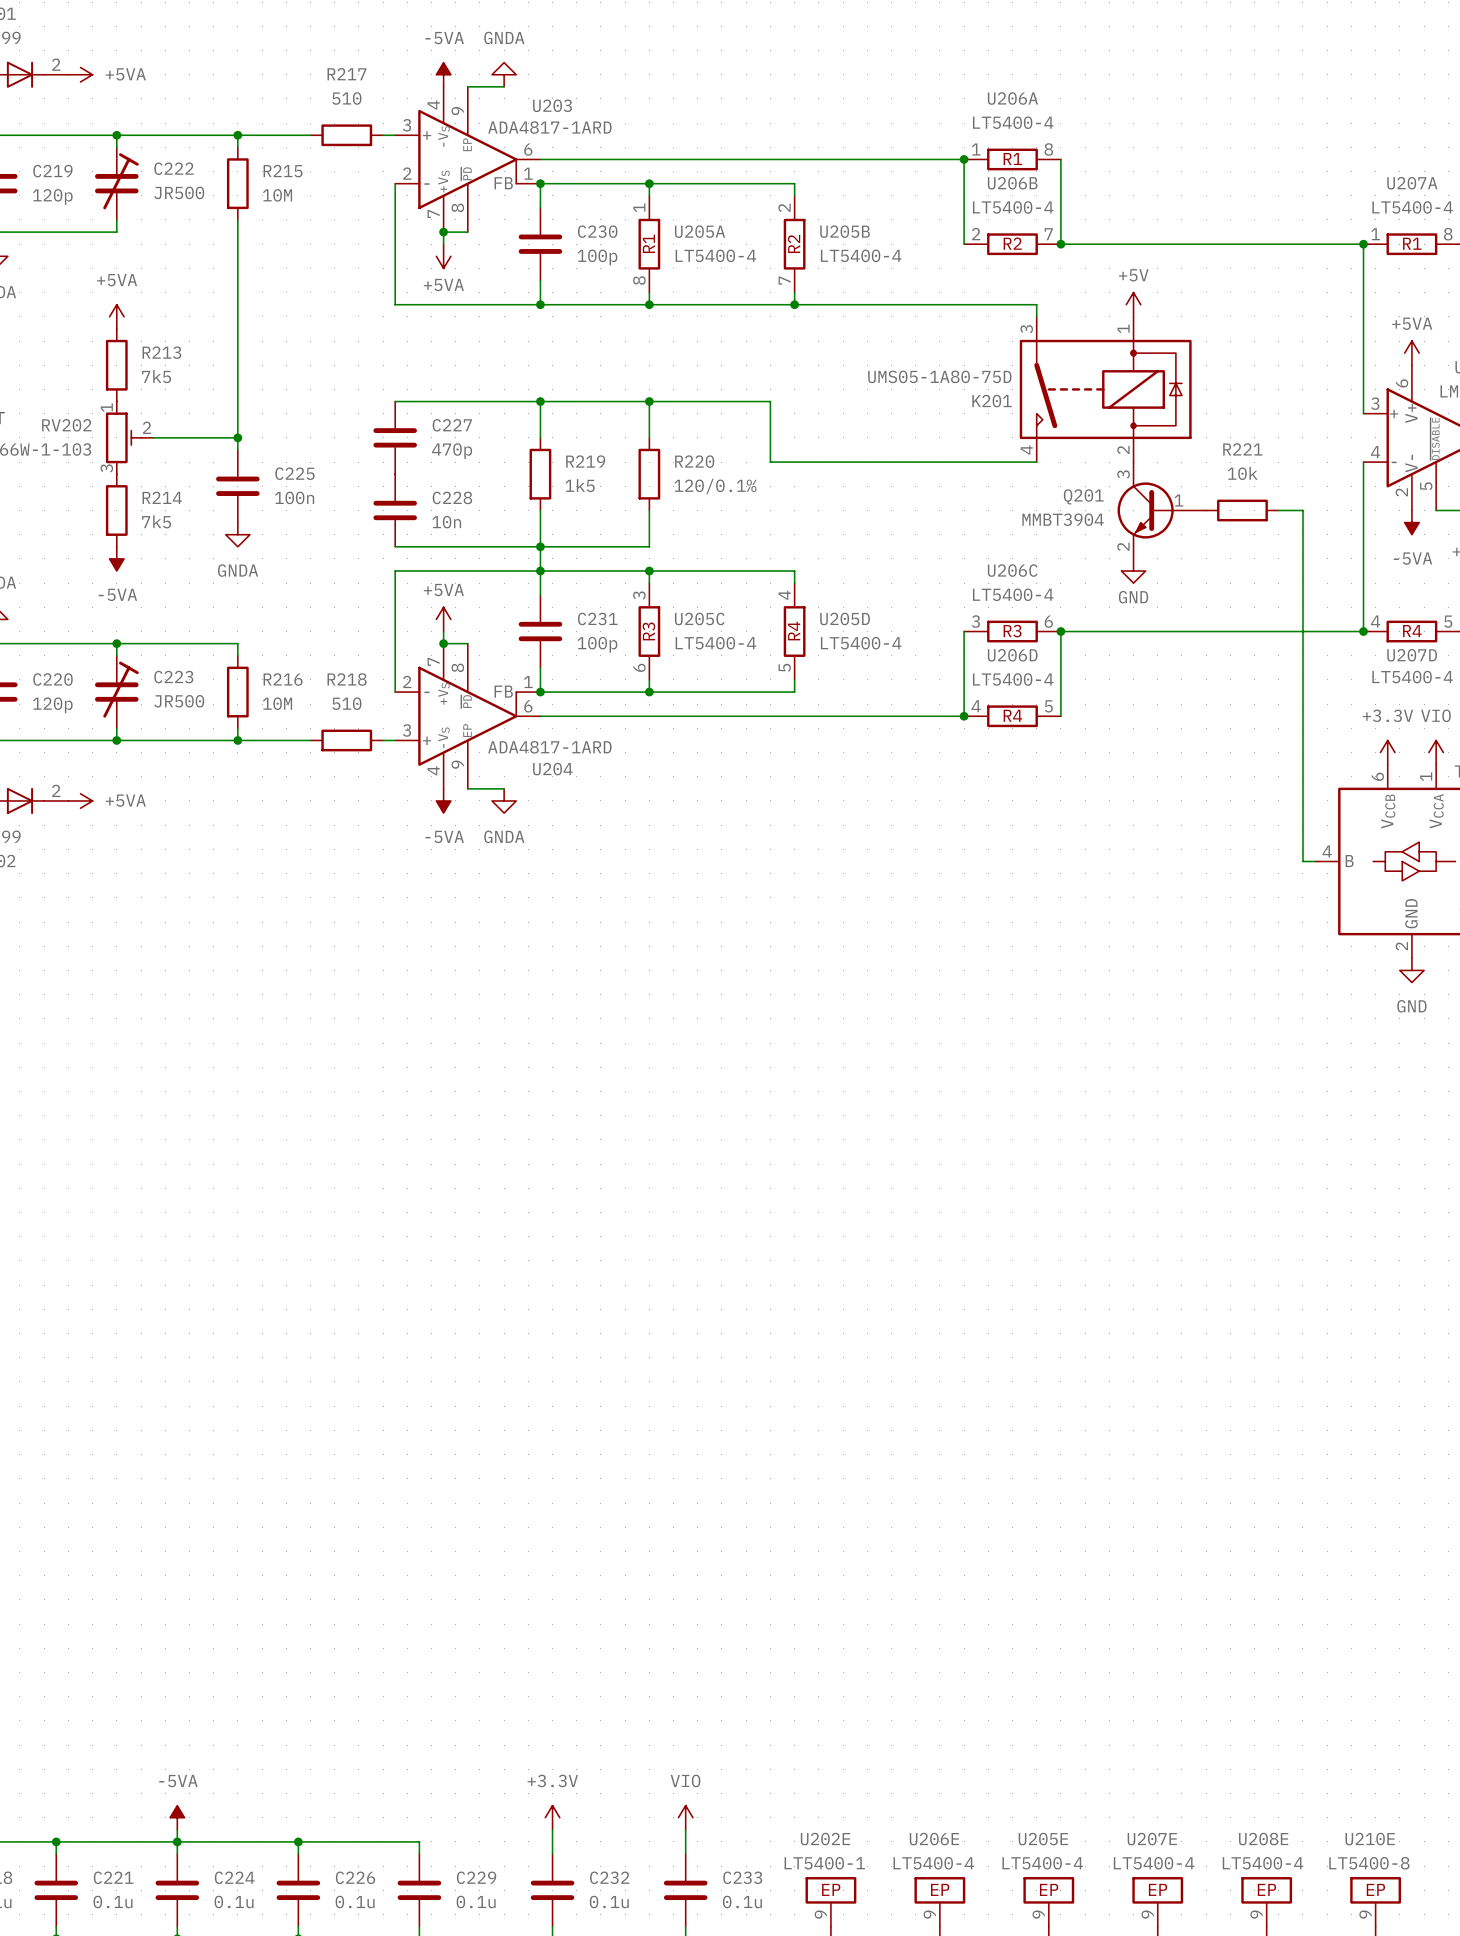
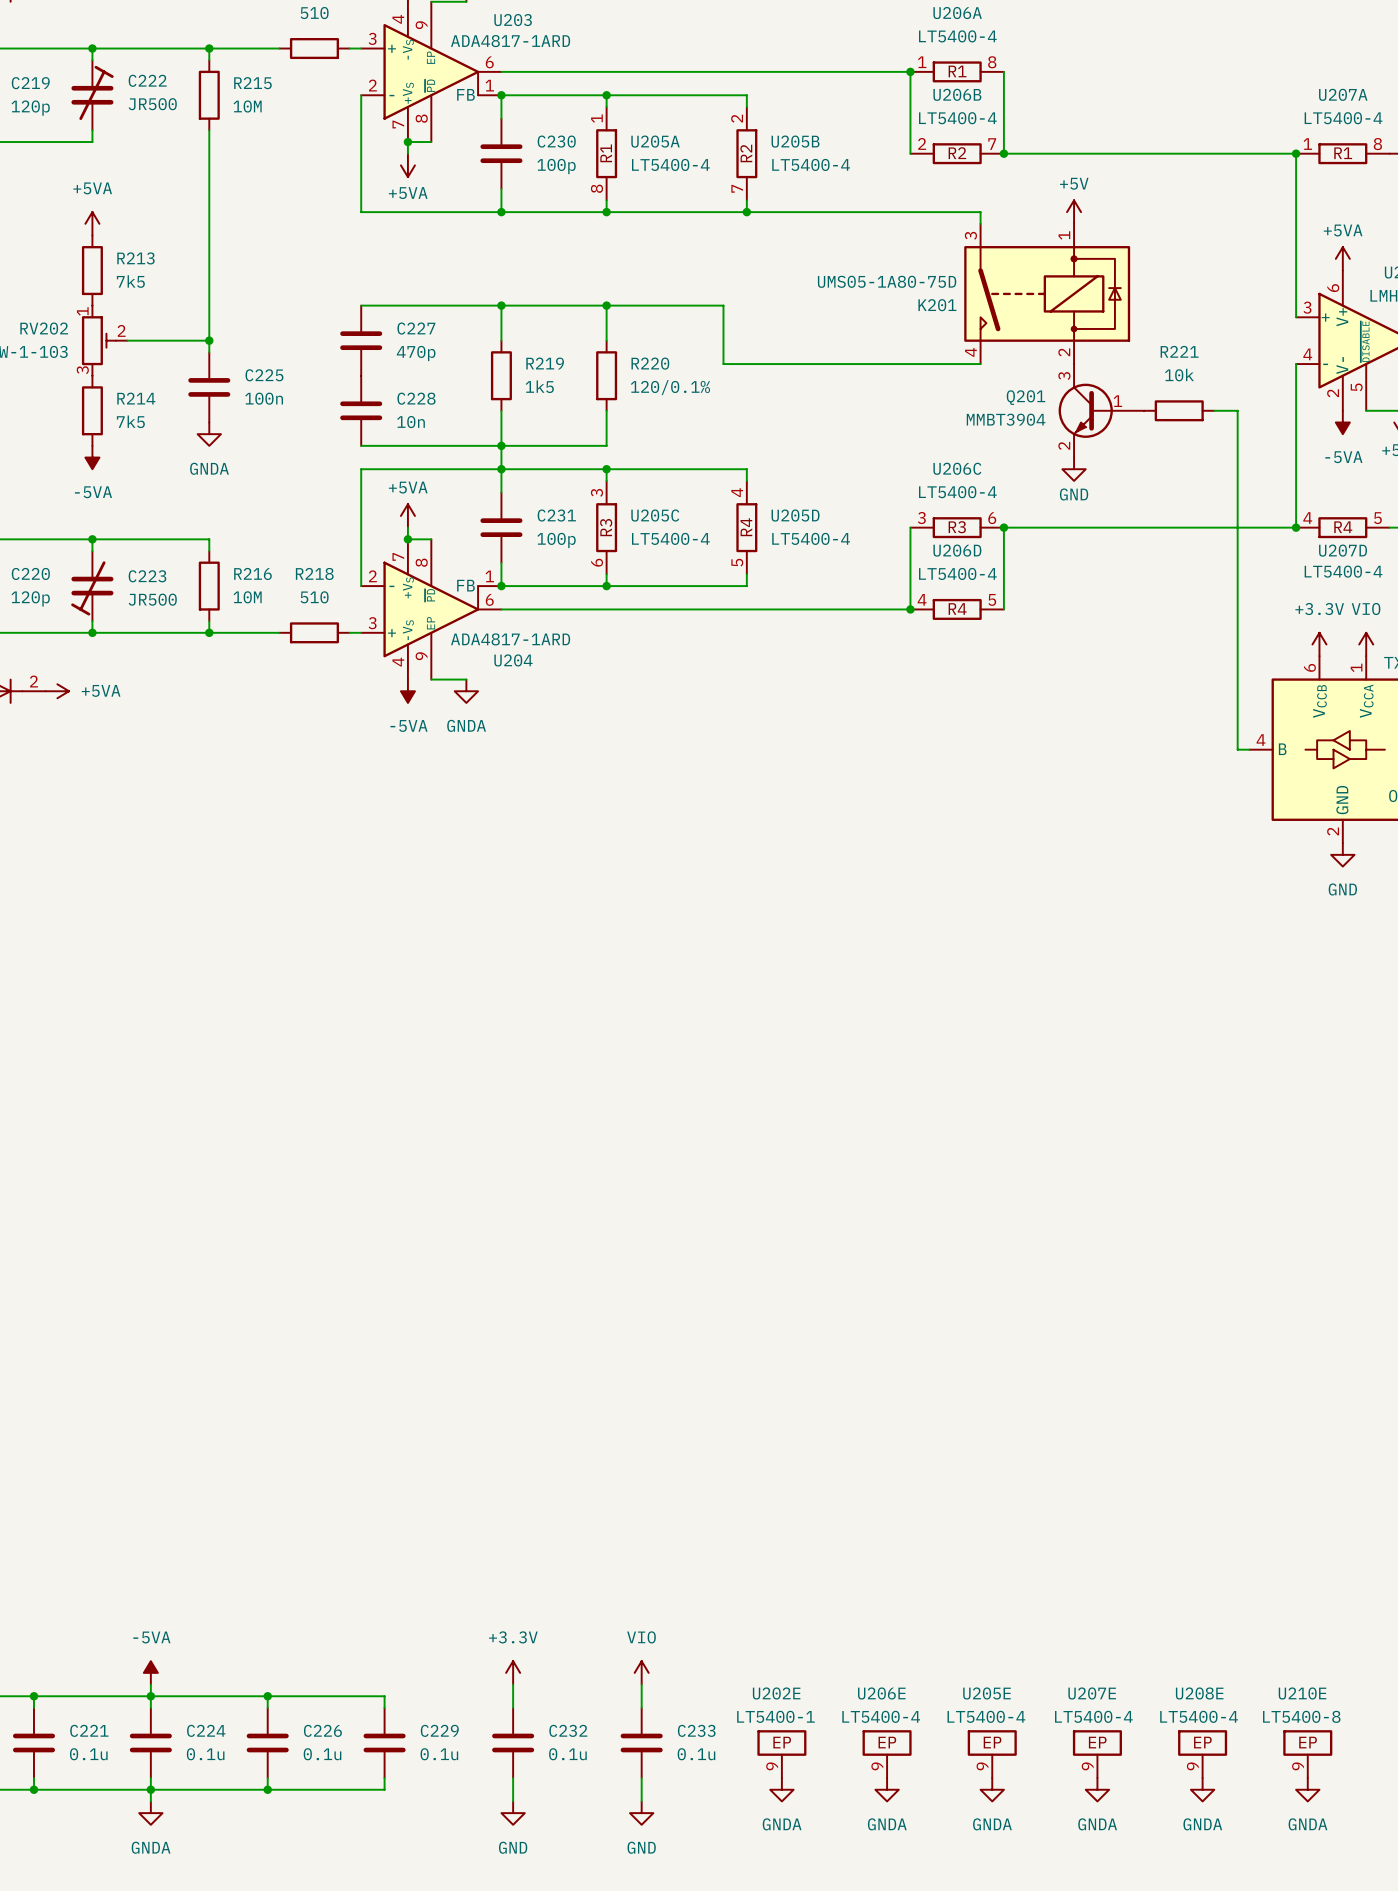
C223 rotation: 0° (116, 689) -> 180° (92, 588)

